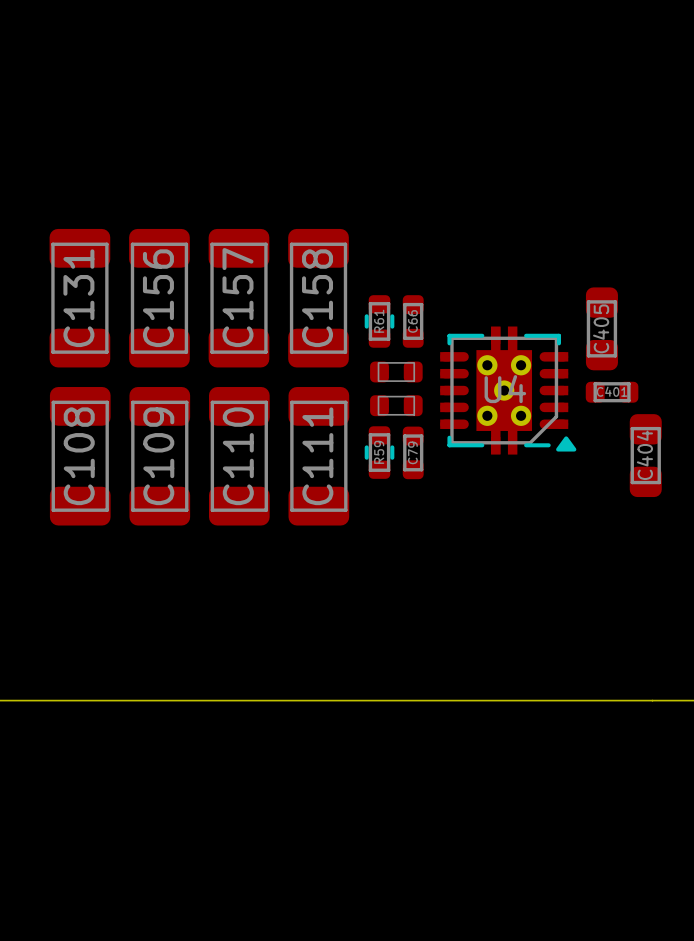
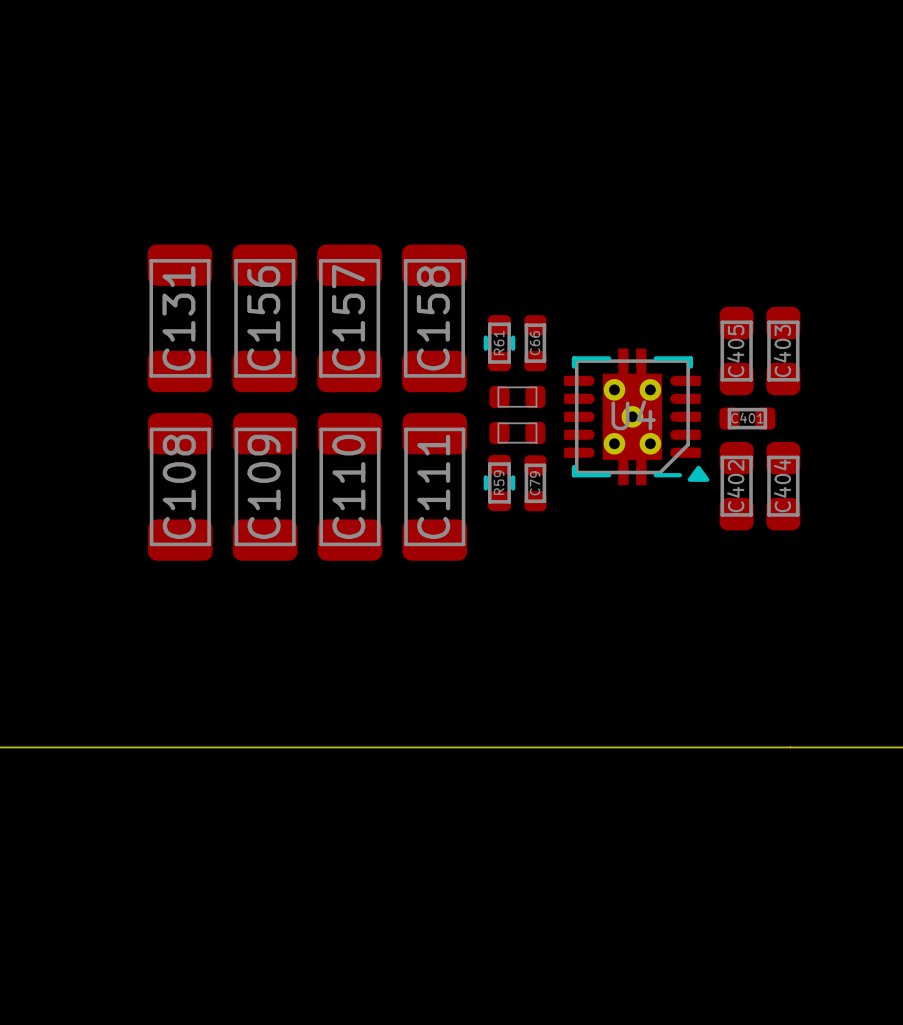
C403: none -> (783, 351)
C402: none -> (736, 486)

